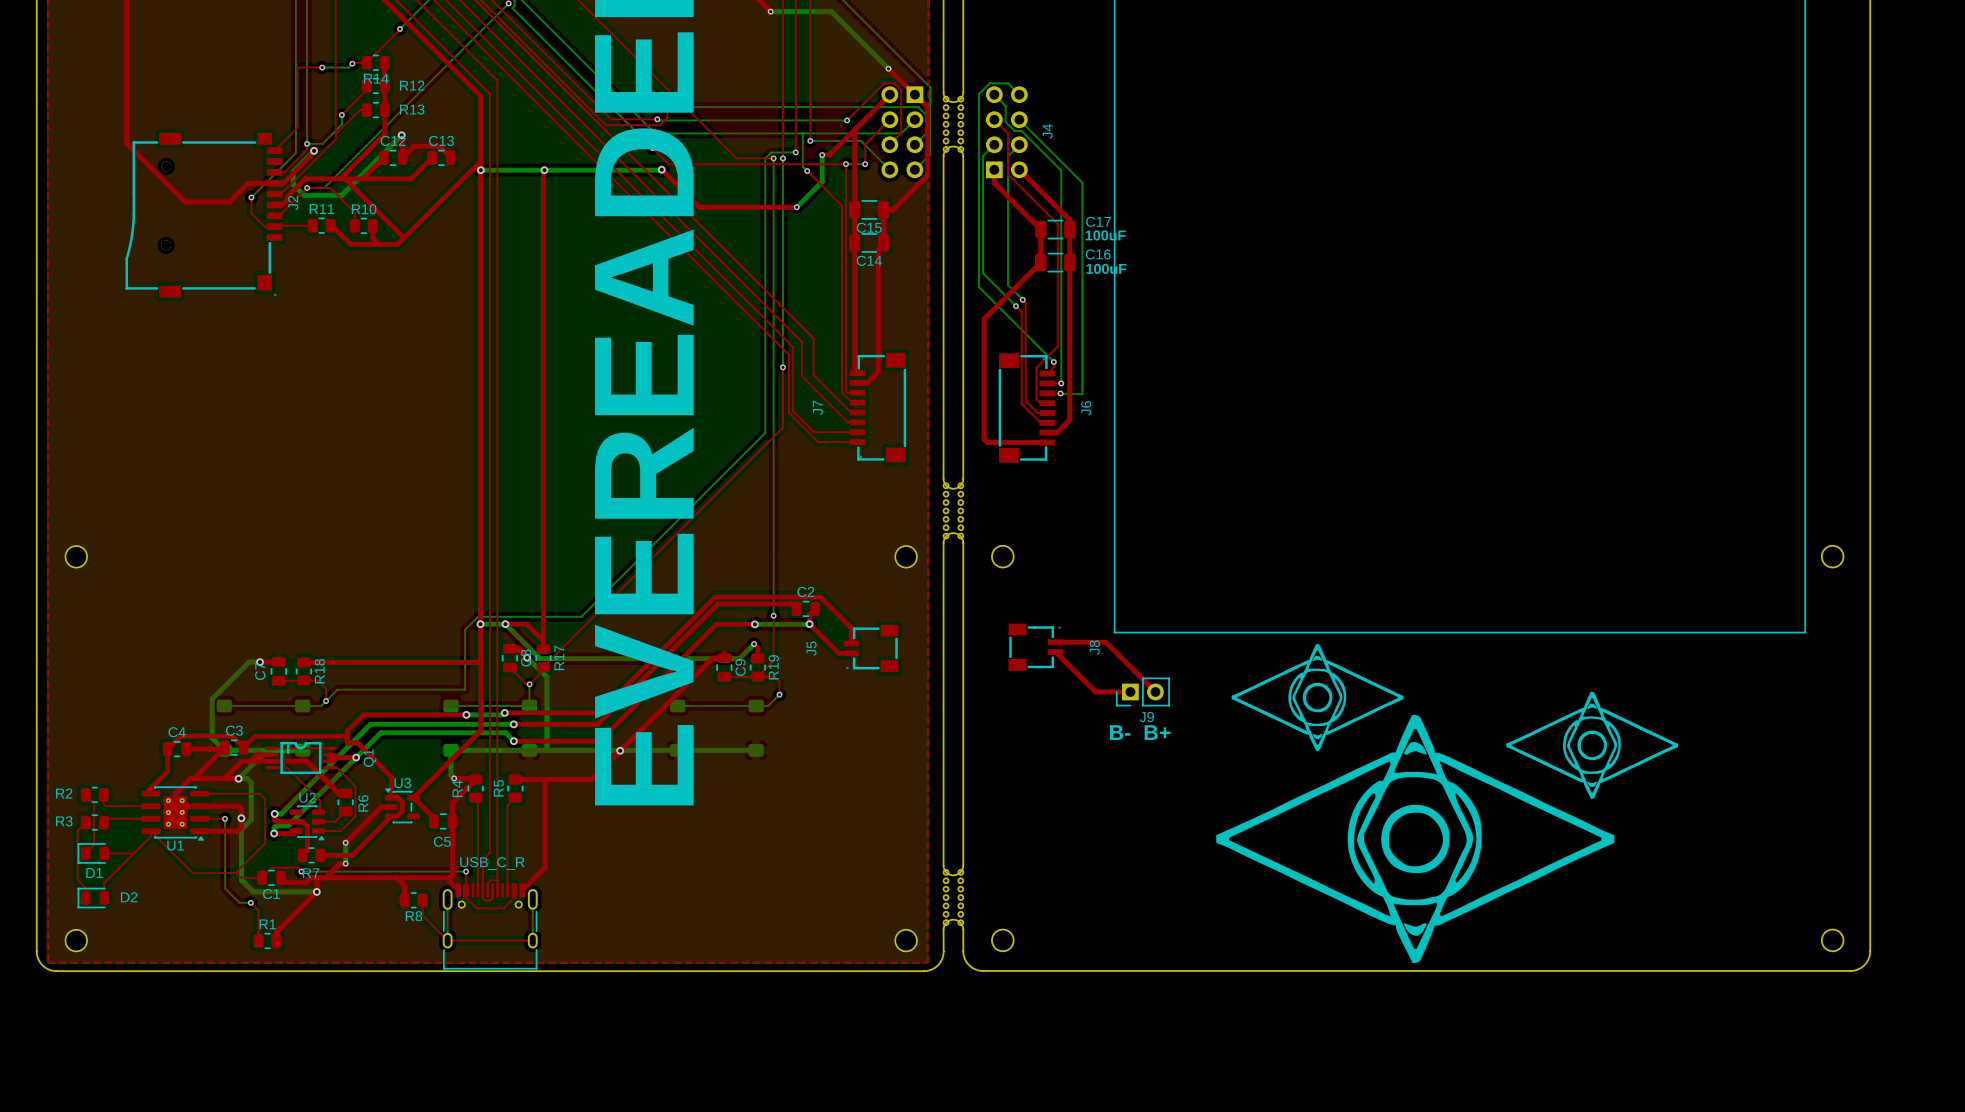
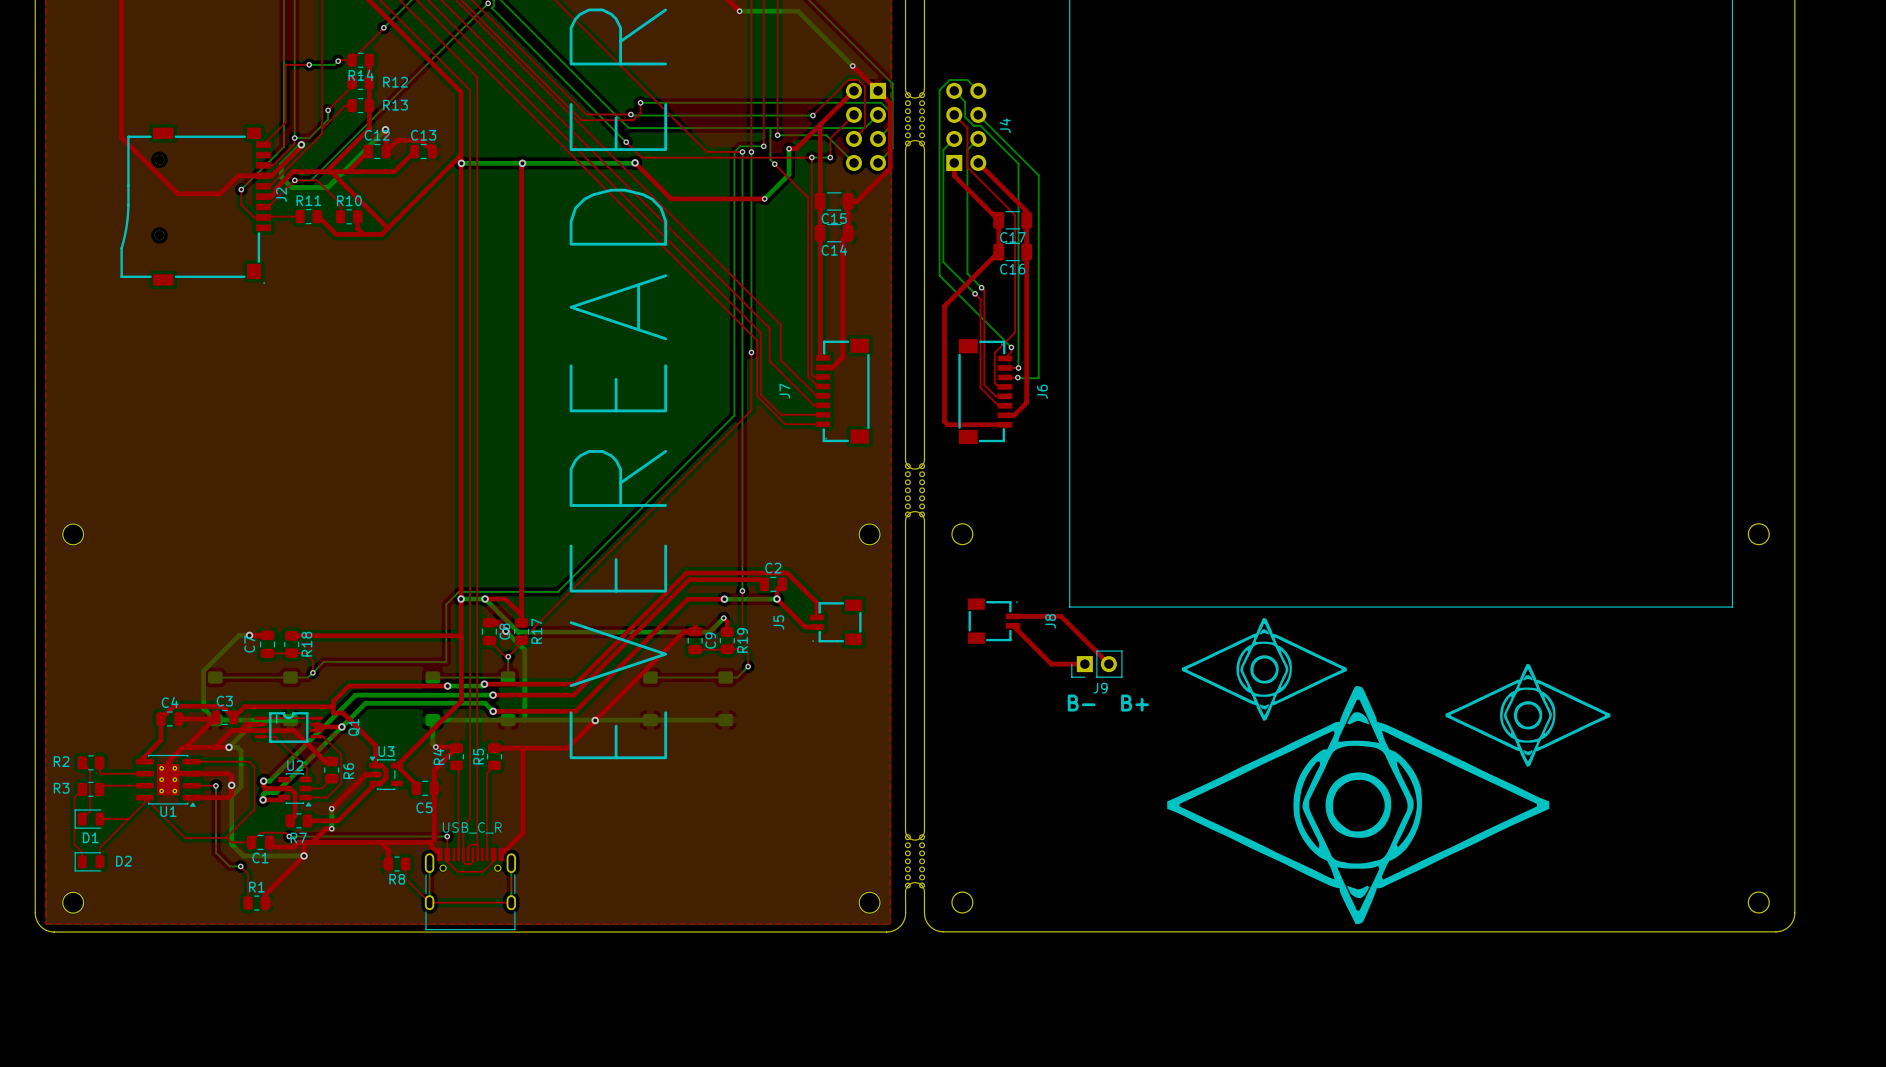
C17 name position: C17 (1098, 221) -> C17 (1012, 237)
text: 100uF (1105, 235) -> none
C16 name position: C16 (1098, 254) -> C16 (1012, 269)
text: 100uF (1106, 268) -> none

